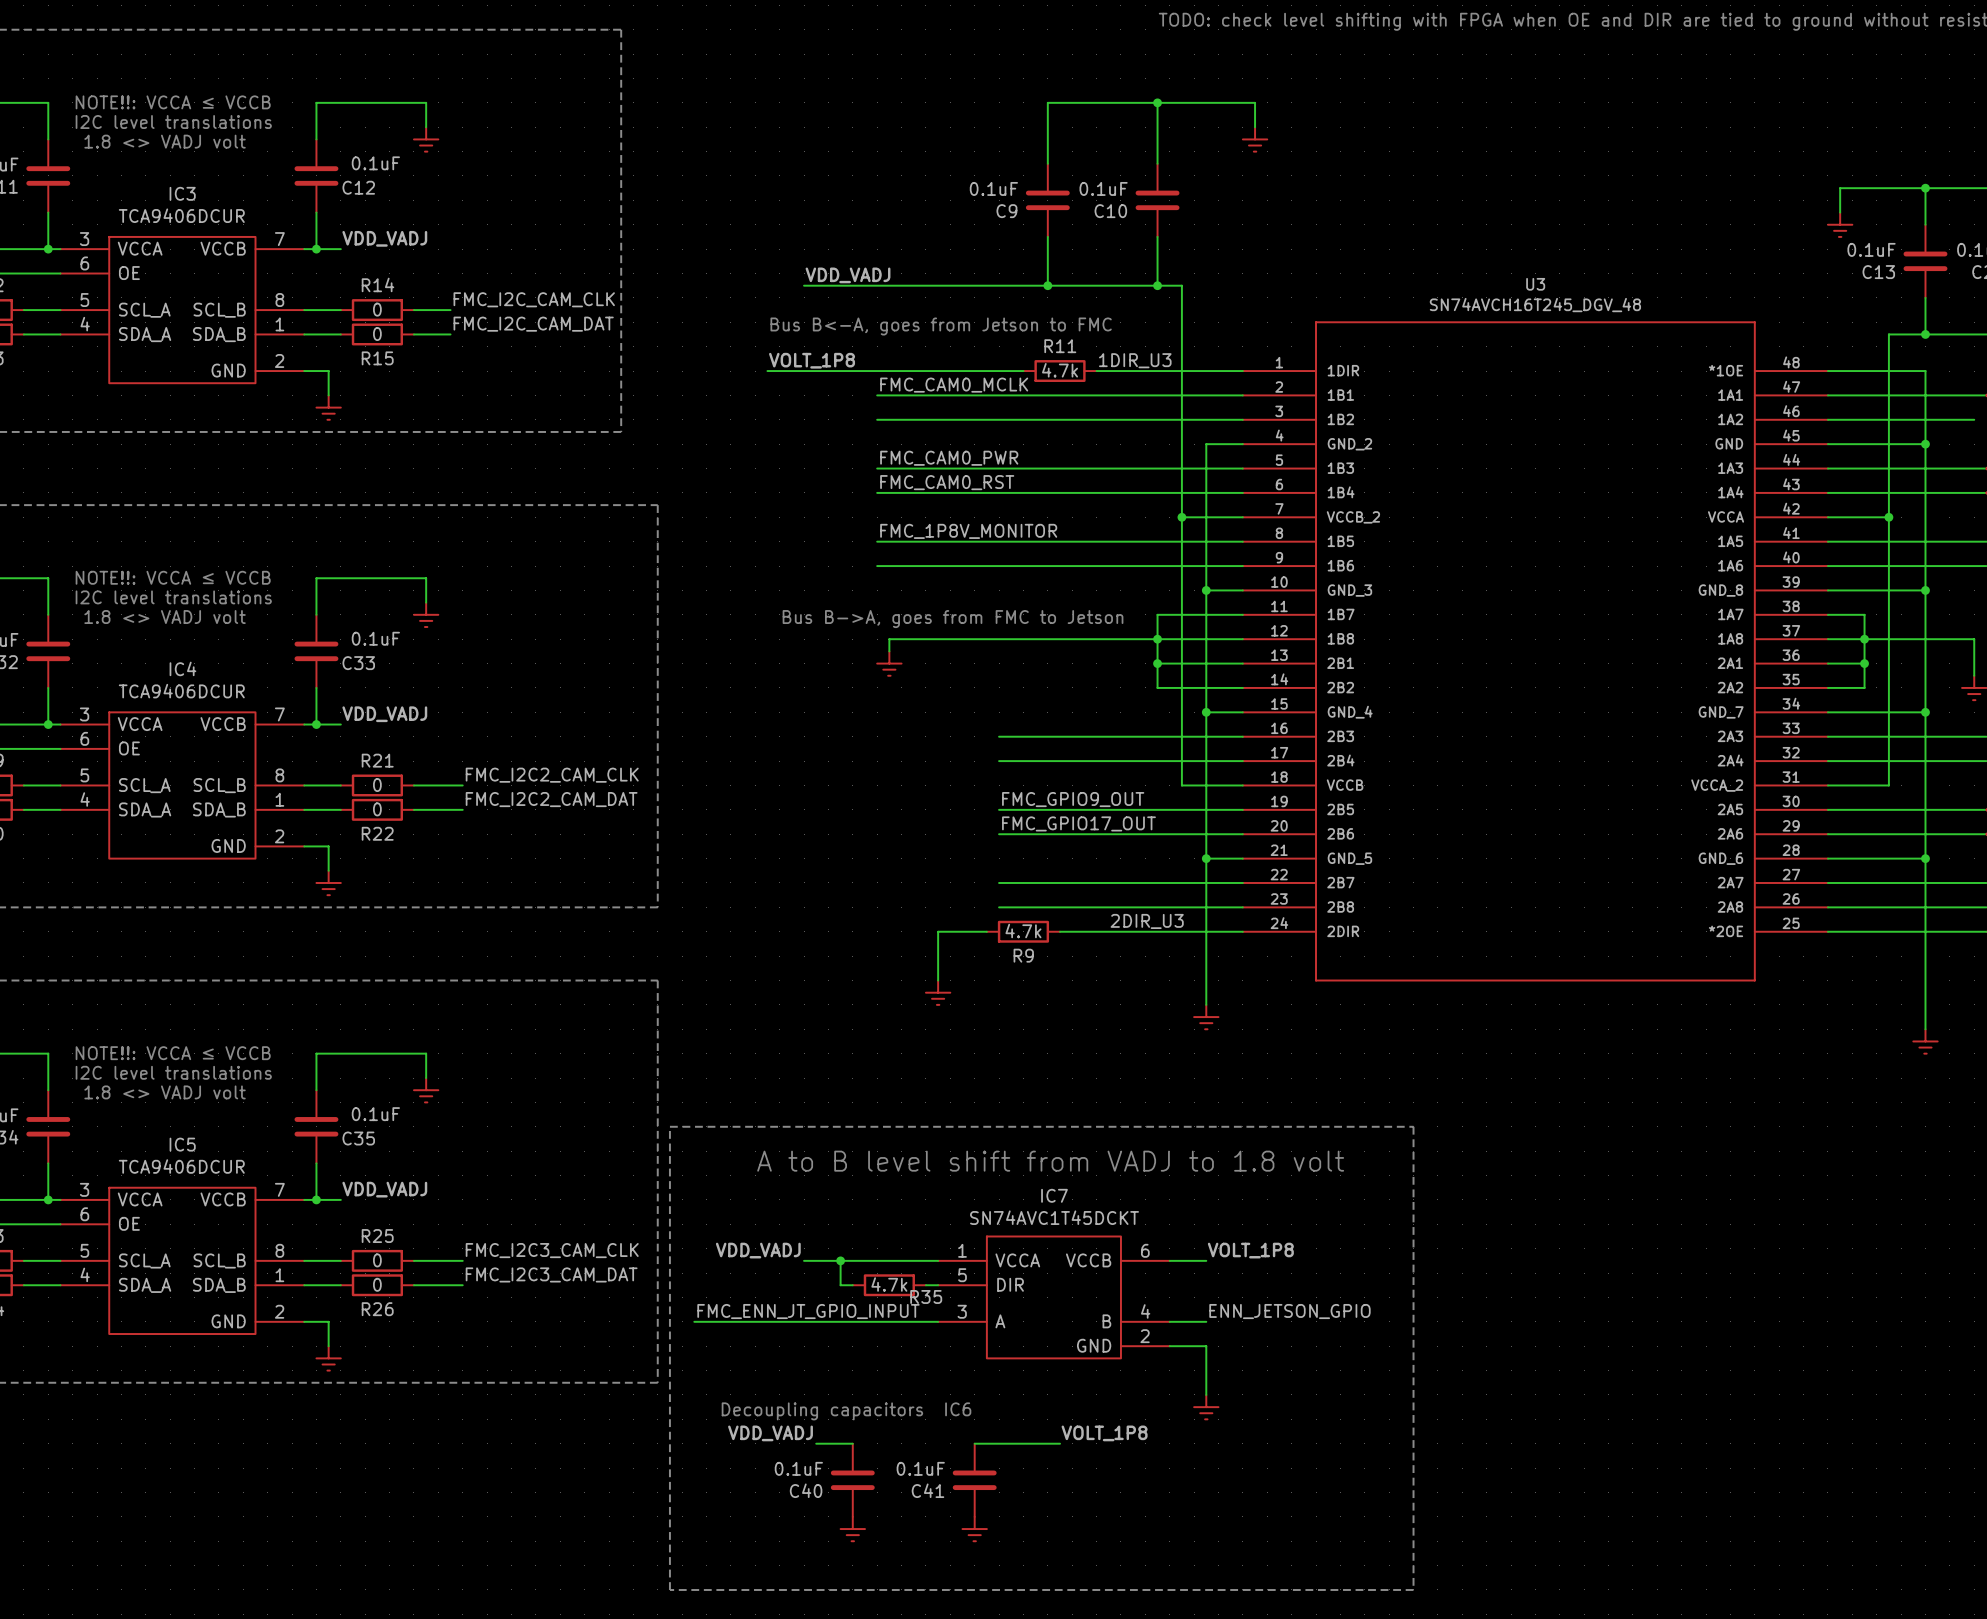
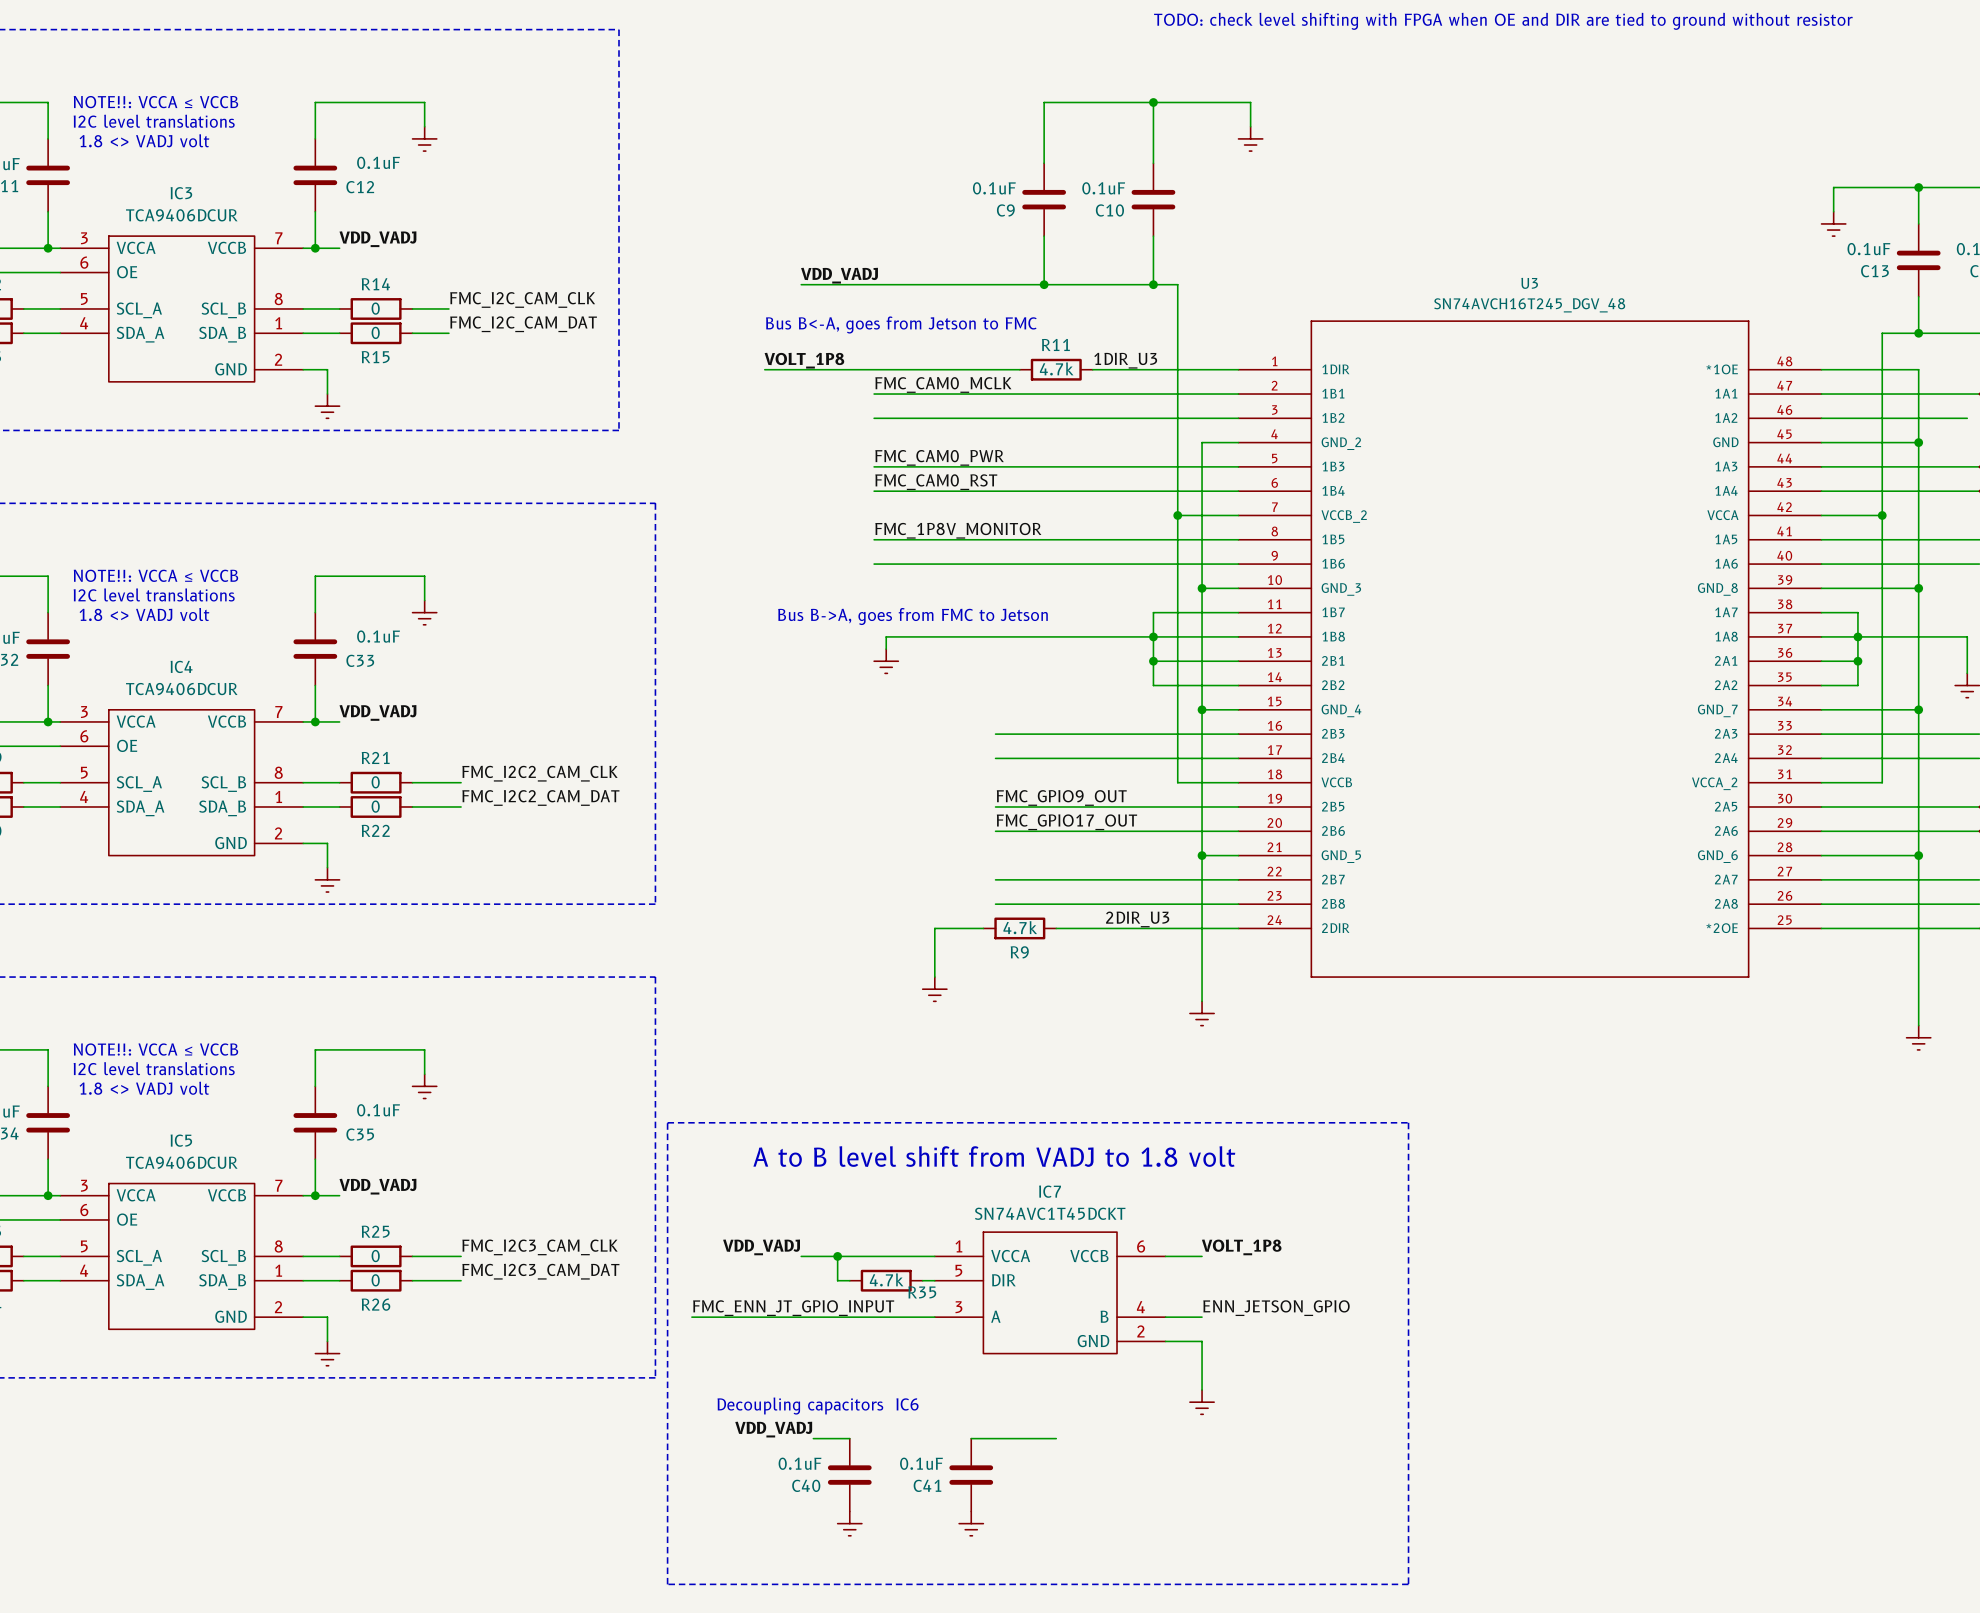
label: VOLT_1P8 (1104, 1433) -> none

